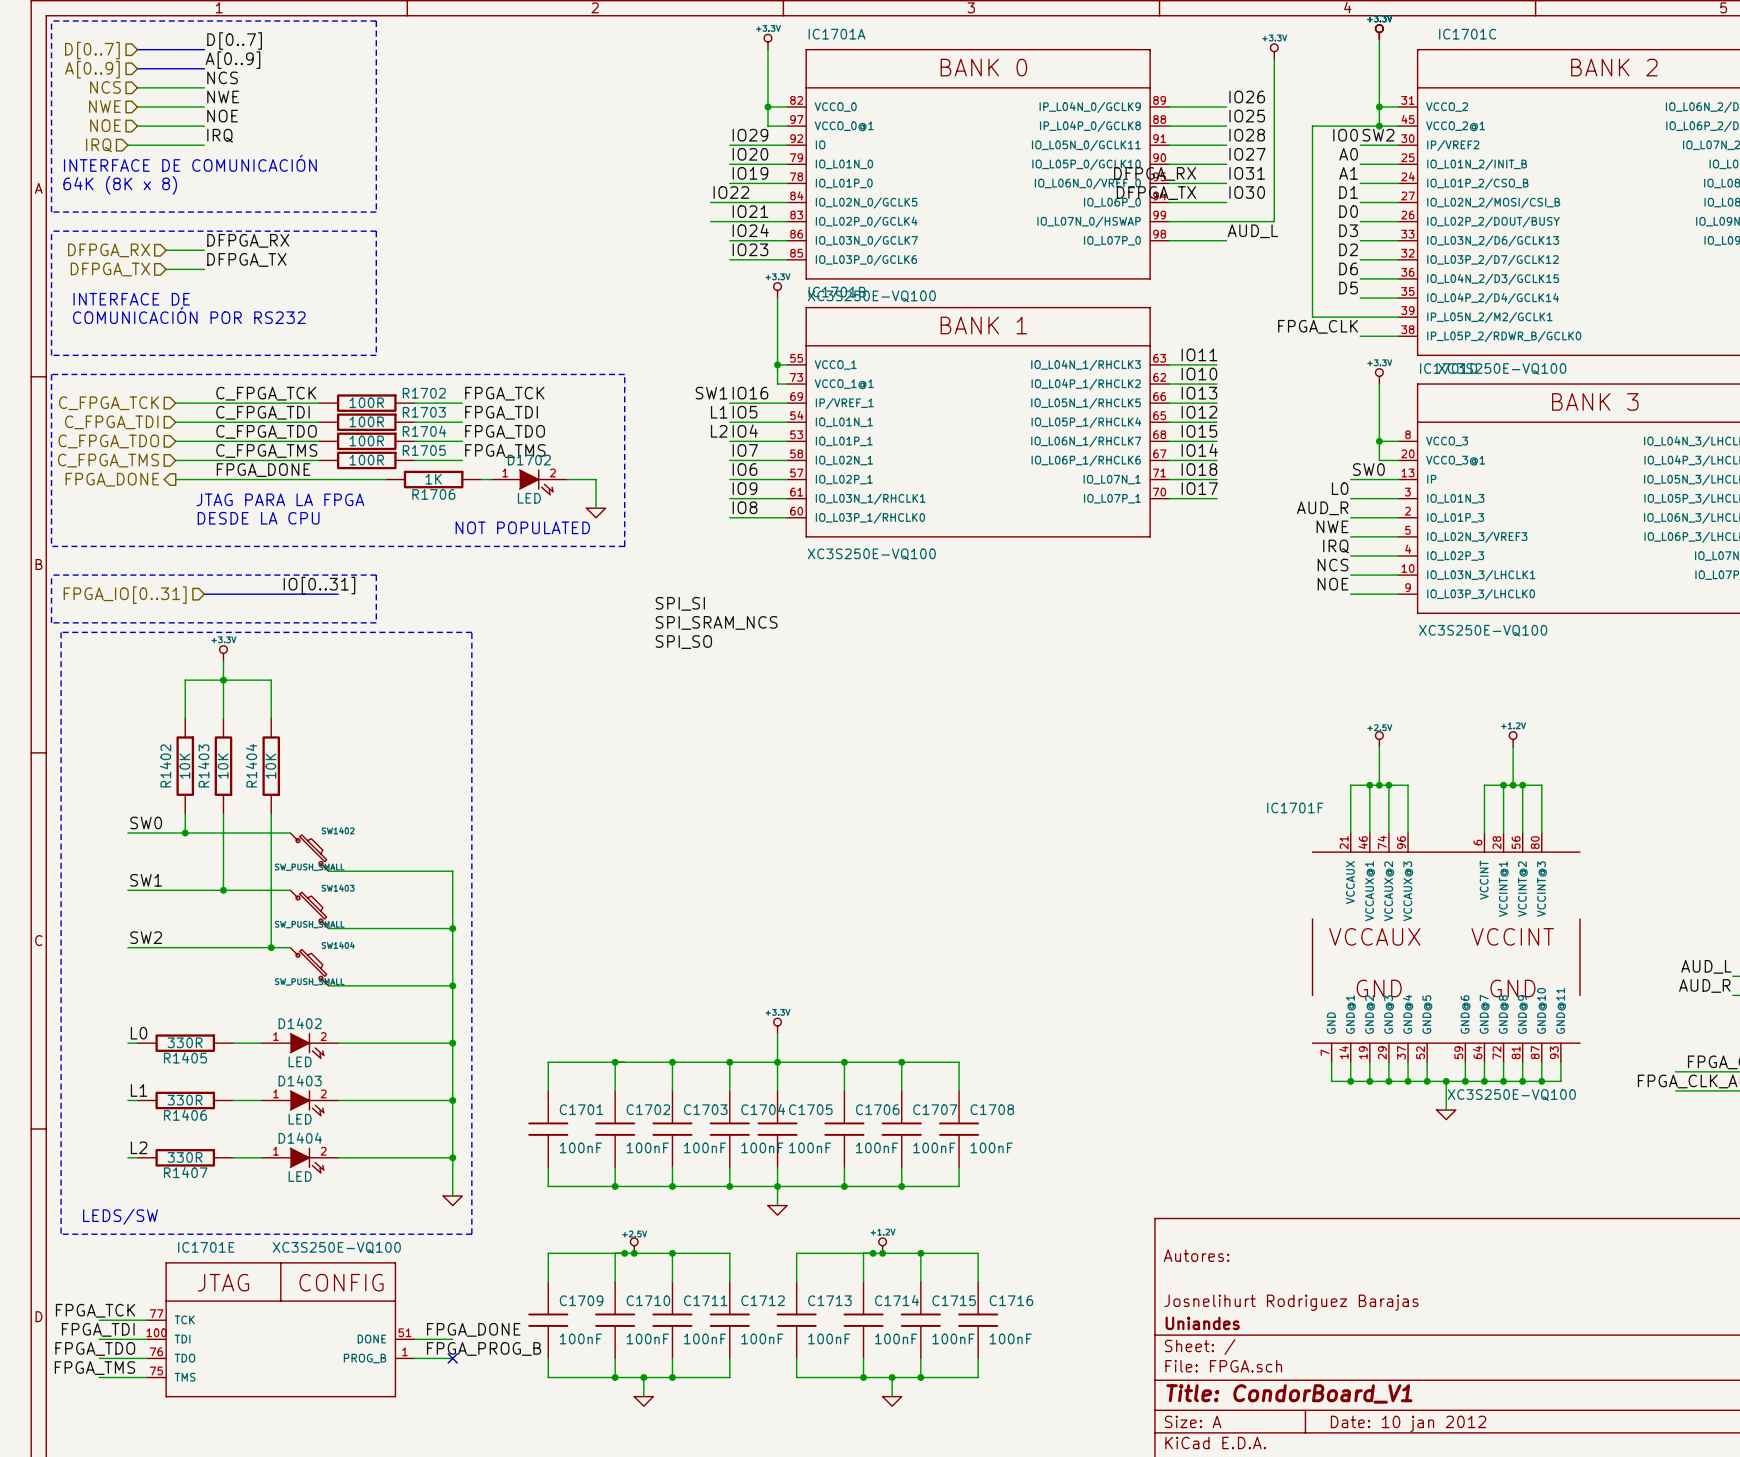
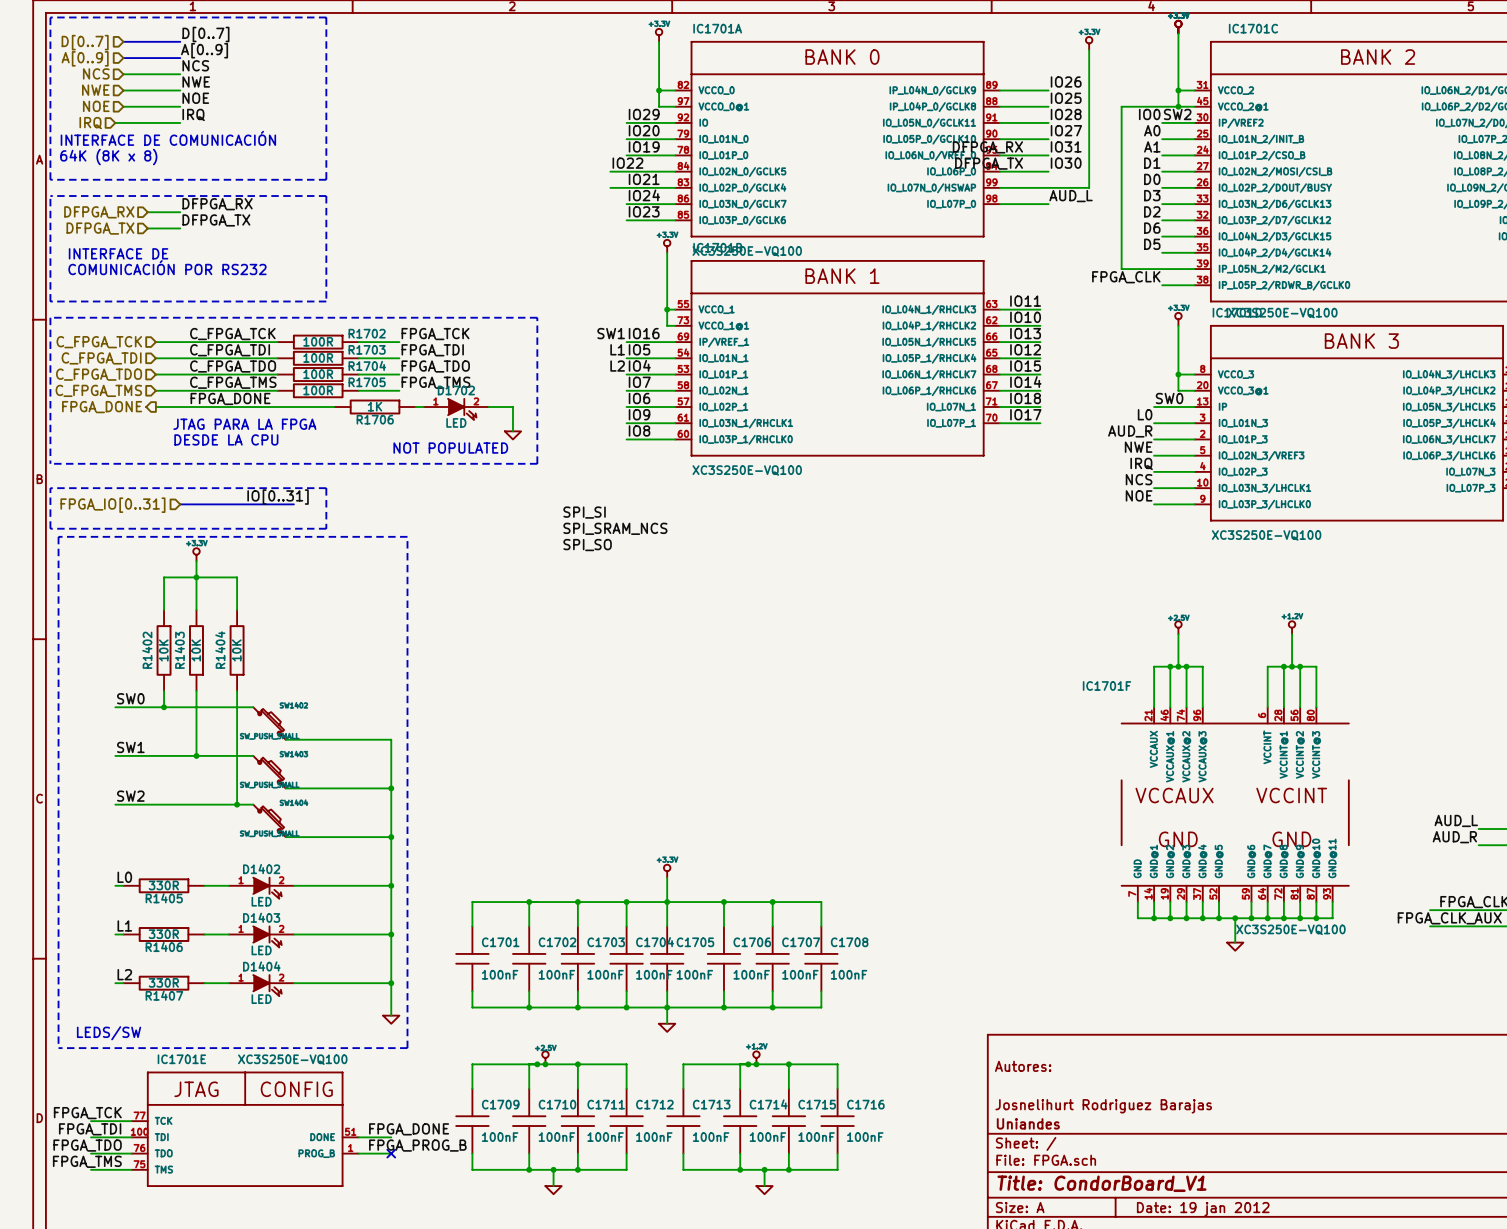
title block: Date: 10 jan 2012 (1408, 1423) -> Date: 19 jan 2012 (1203, 1209)

